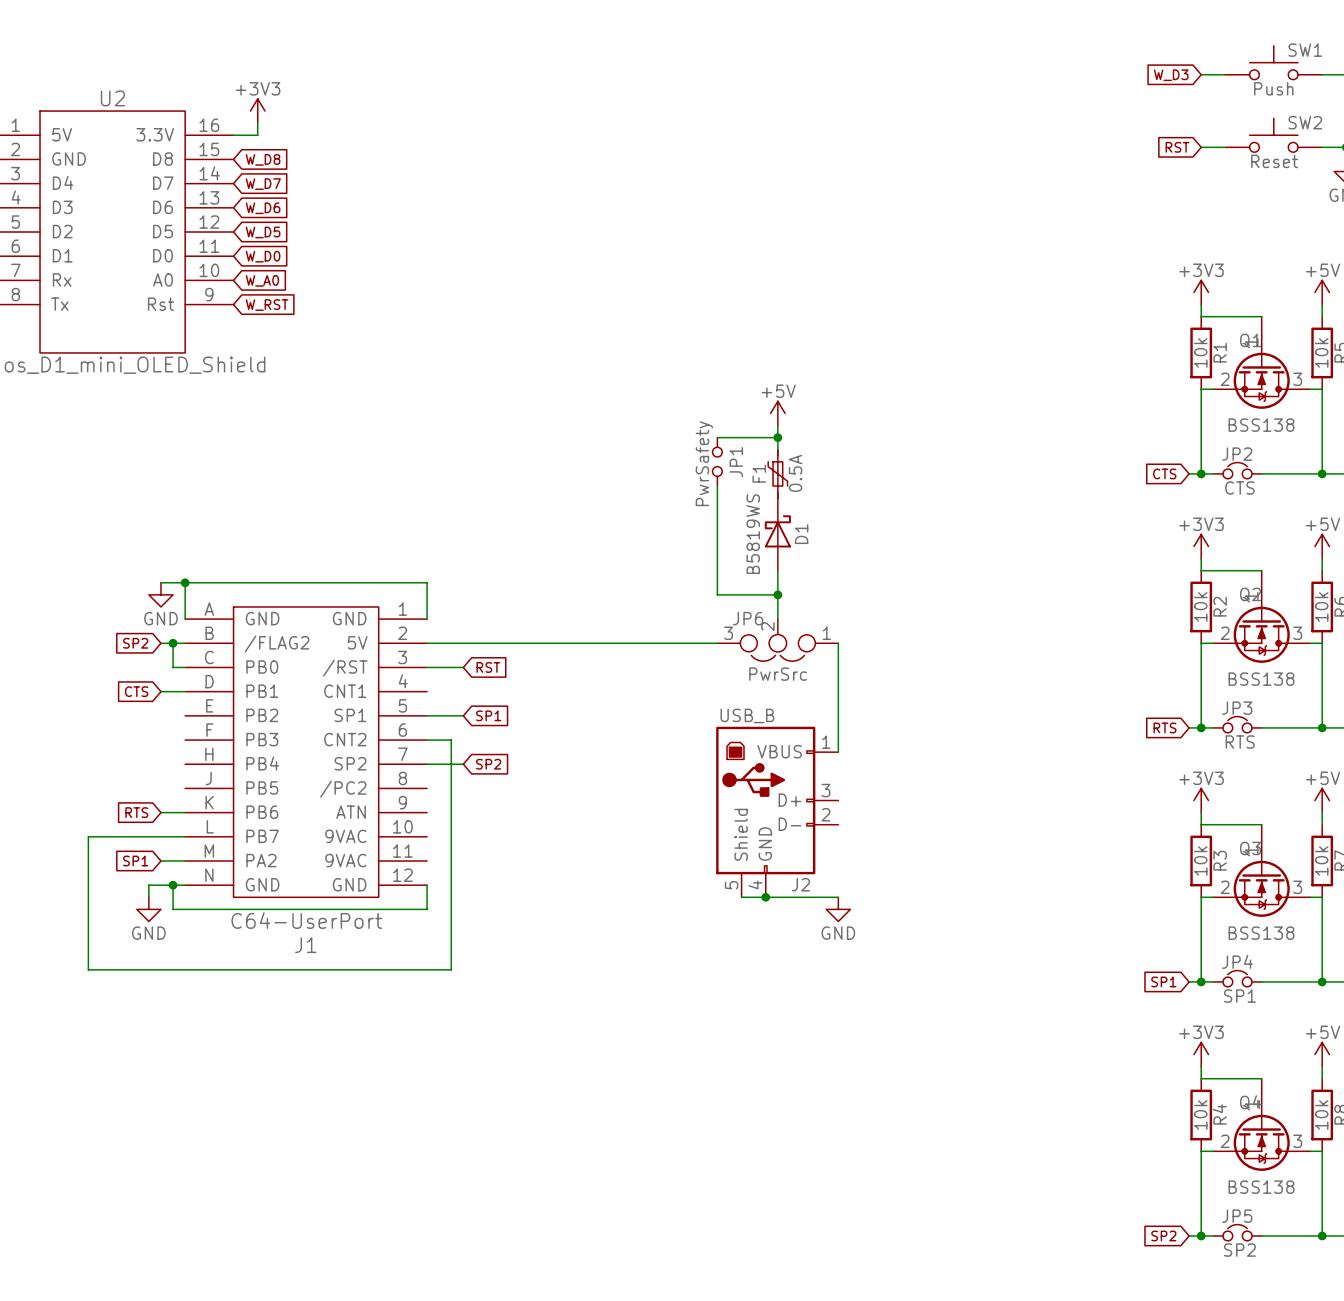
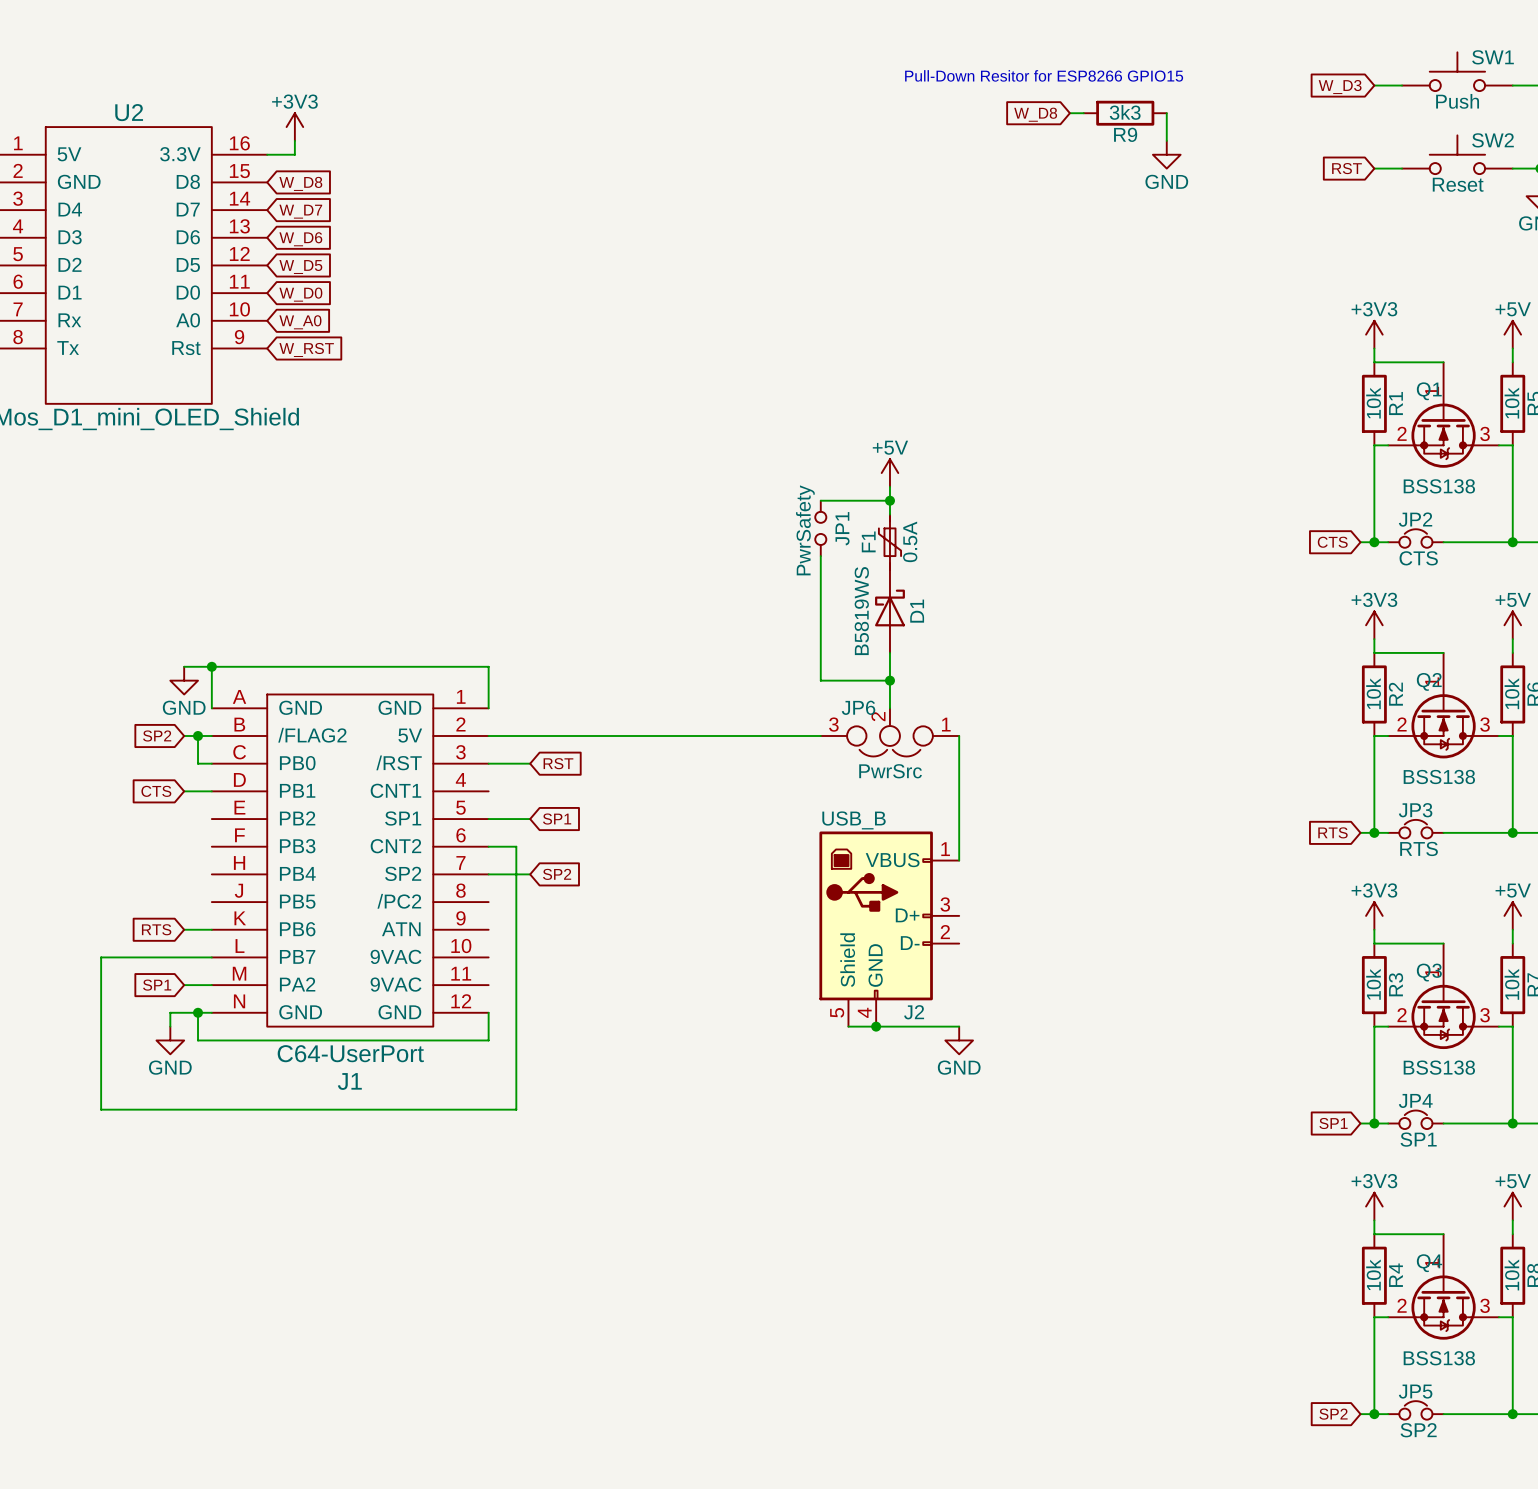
text: none -> Pull-Down Resitor for ESP8266 GPIO15 (1044, 75)
wire: none -> (1069, 113) (1083, 113)
R9: none -> 3k3 (1125, 113)
wire: none -> (1166, 113) (1166, 140)
global label: none -> W_D8 (1035, 114)
power symbol: none -> GND (1166, 154)

